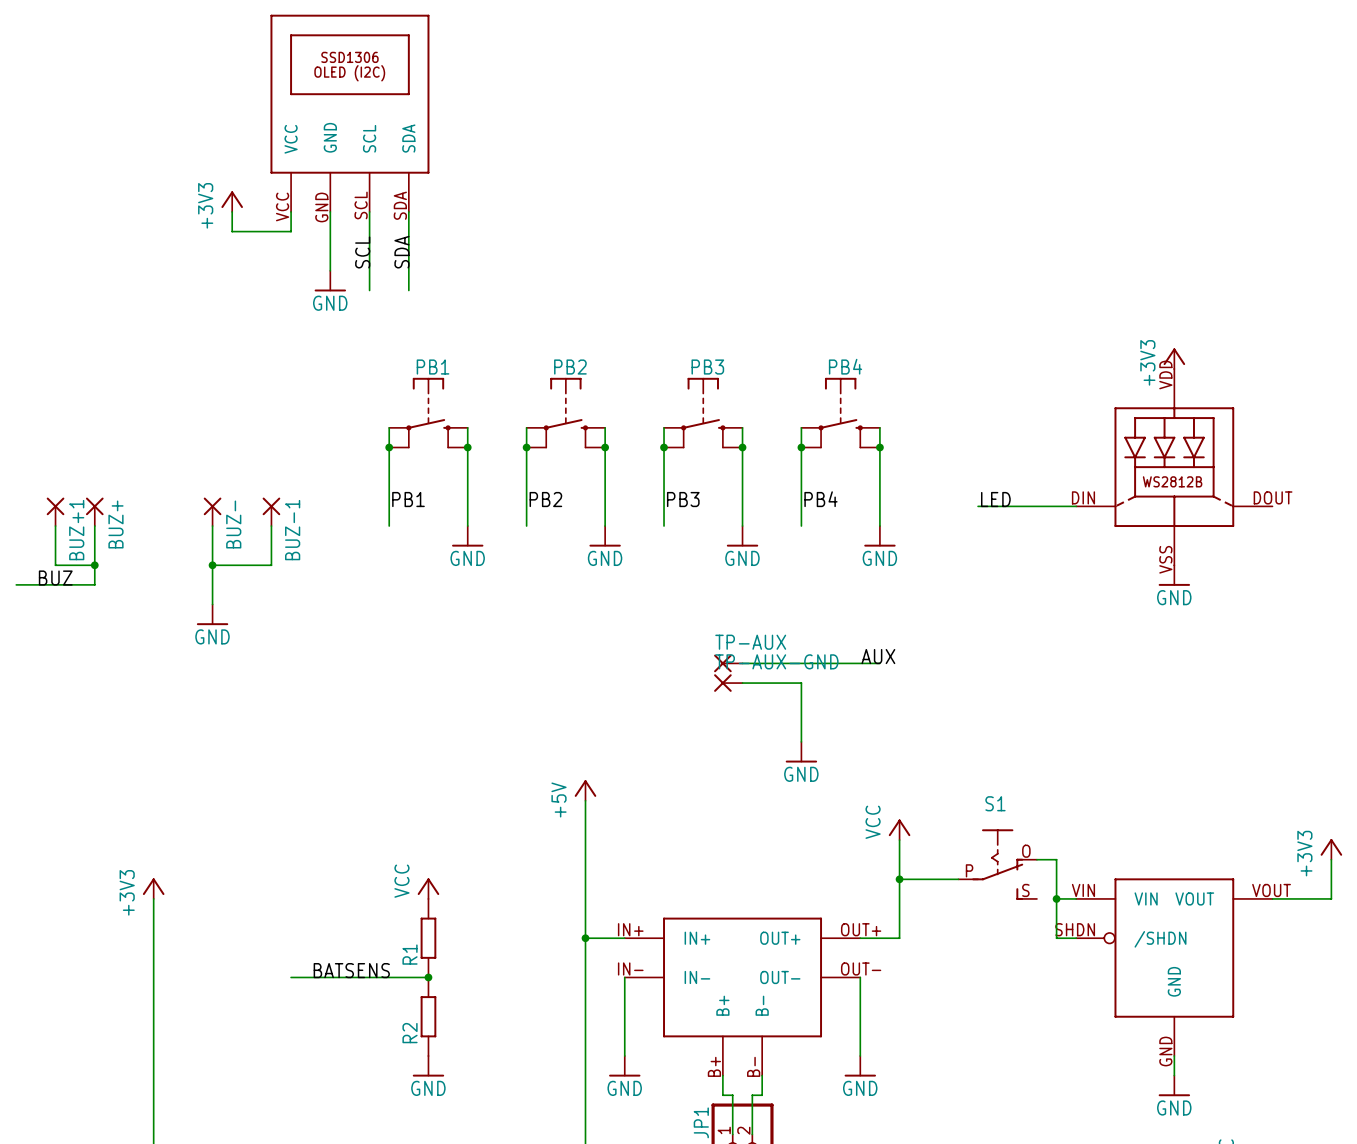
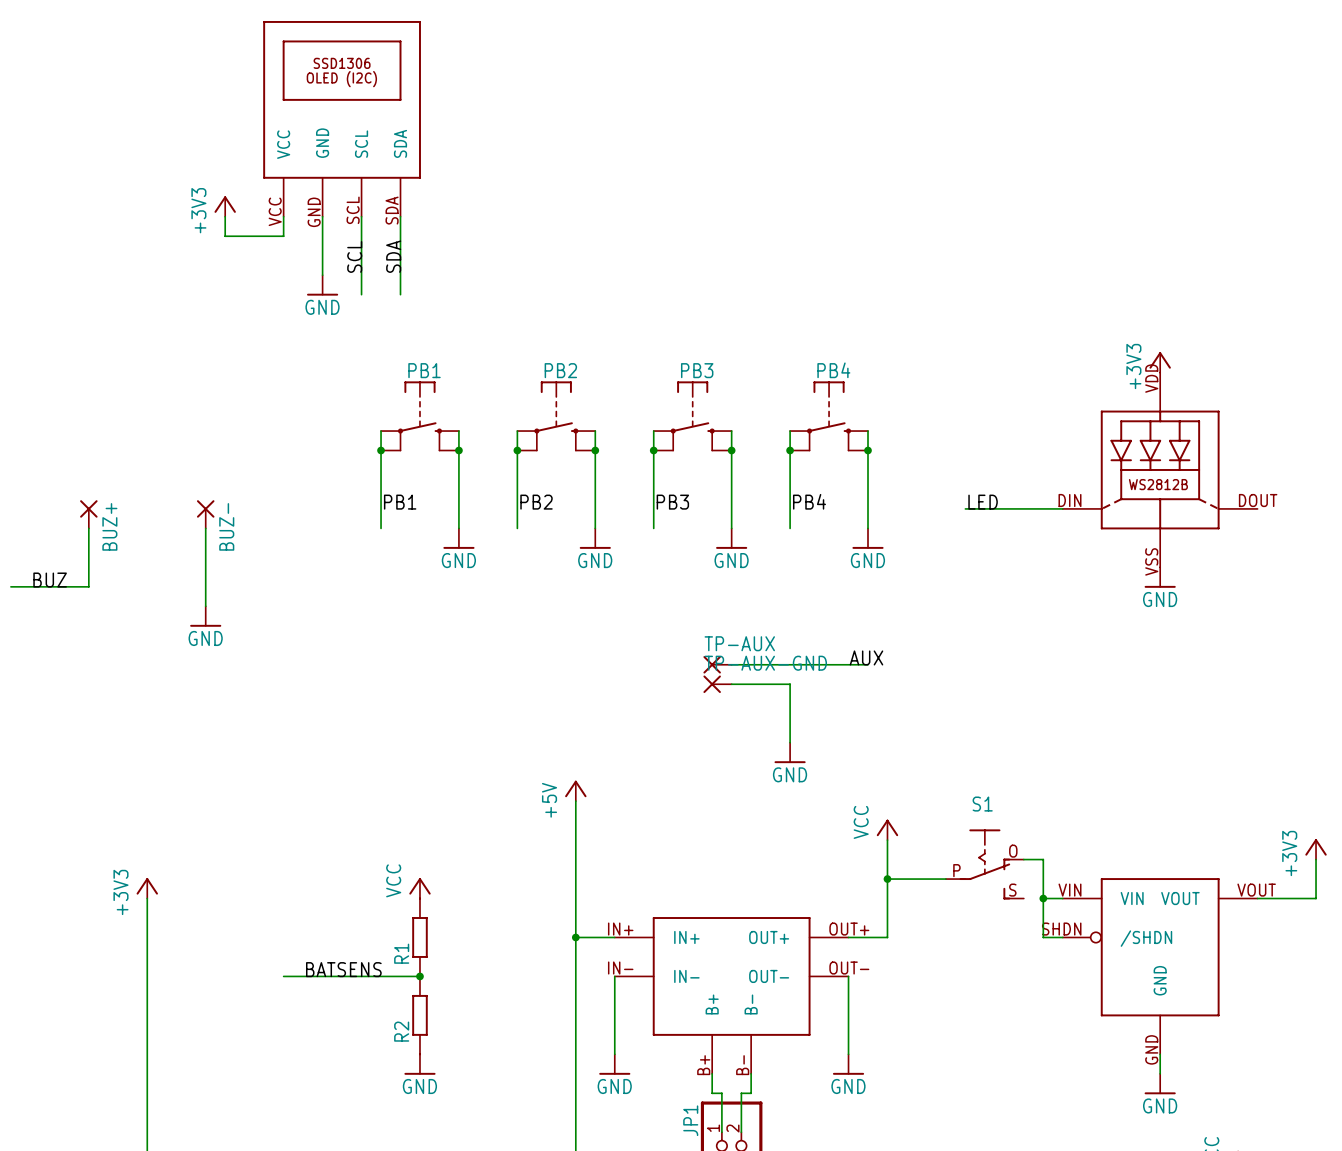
BUZ+1: (55, 511) -> none
BUZ-1: (271, 511) -> none
wire: (55, 526) (55, 565) (94, 565) -> none
wire: (271, 526) (271, 565) (212, 565) -> none
junction: (94, 565) -> none
junction: (212, 565) -> none

